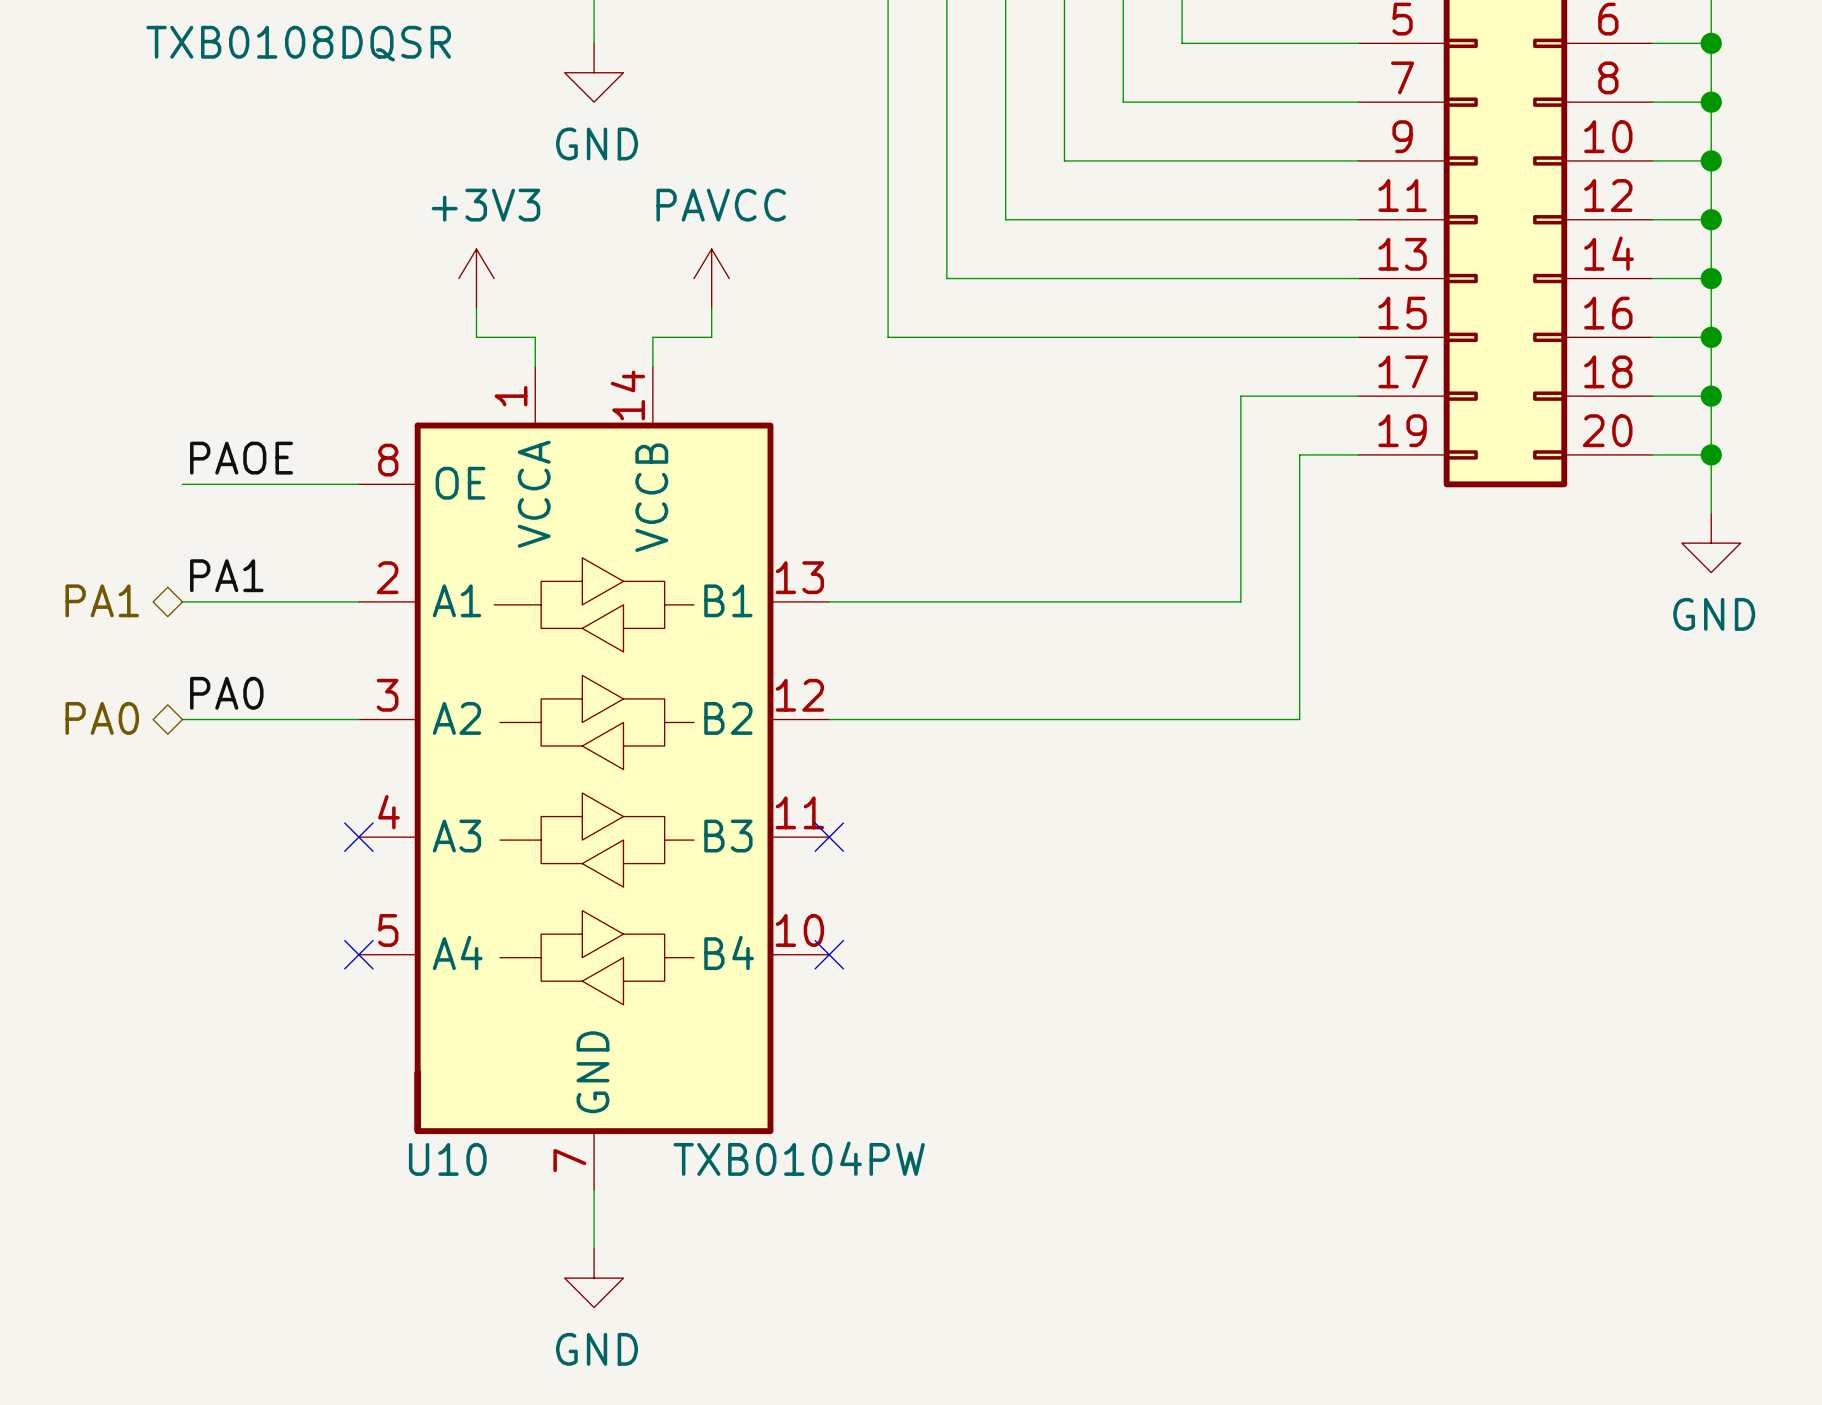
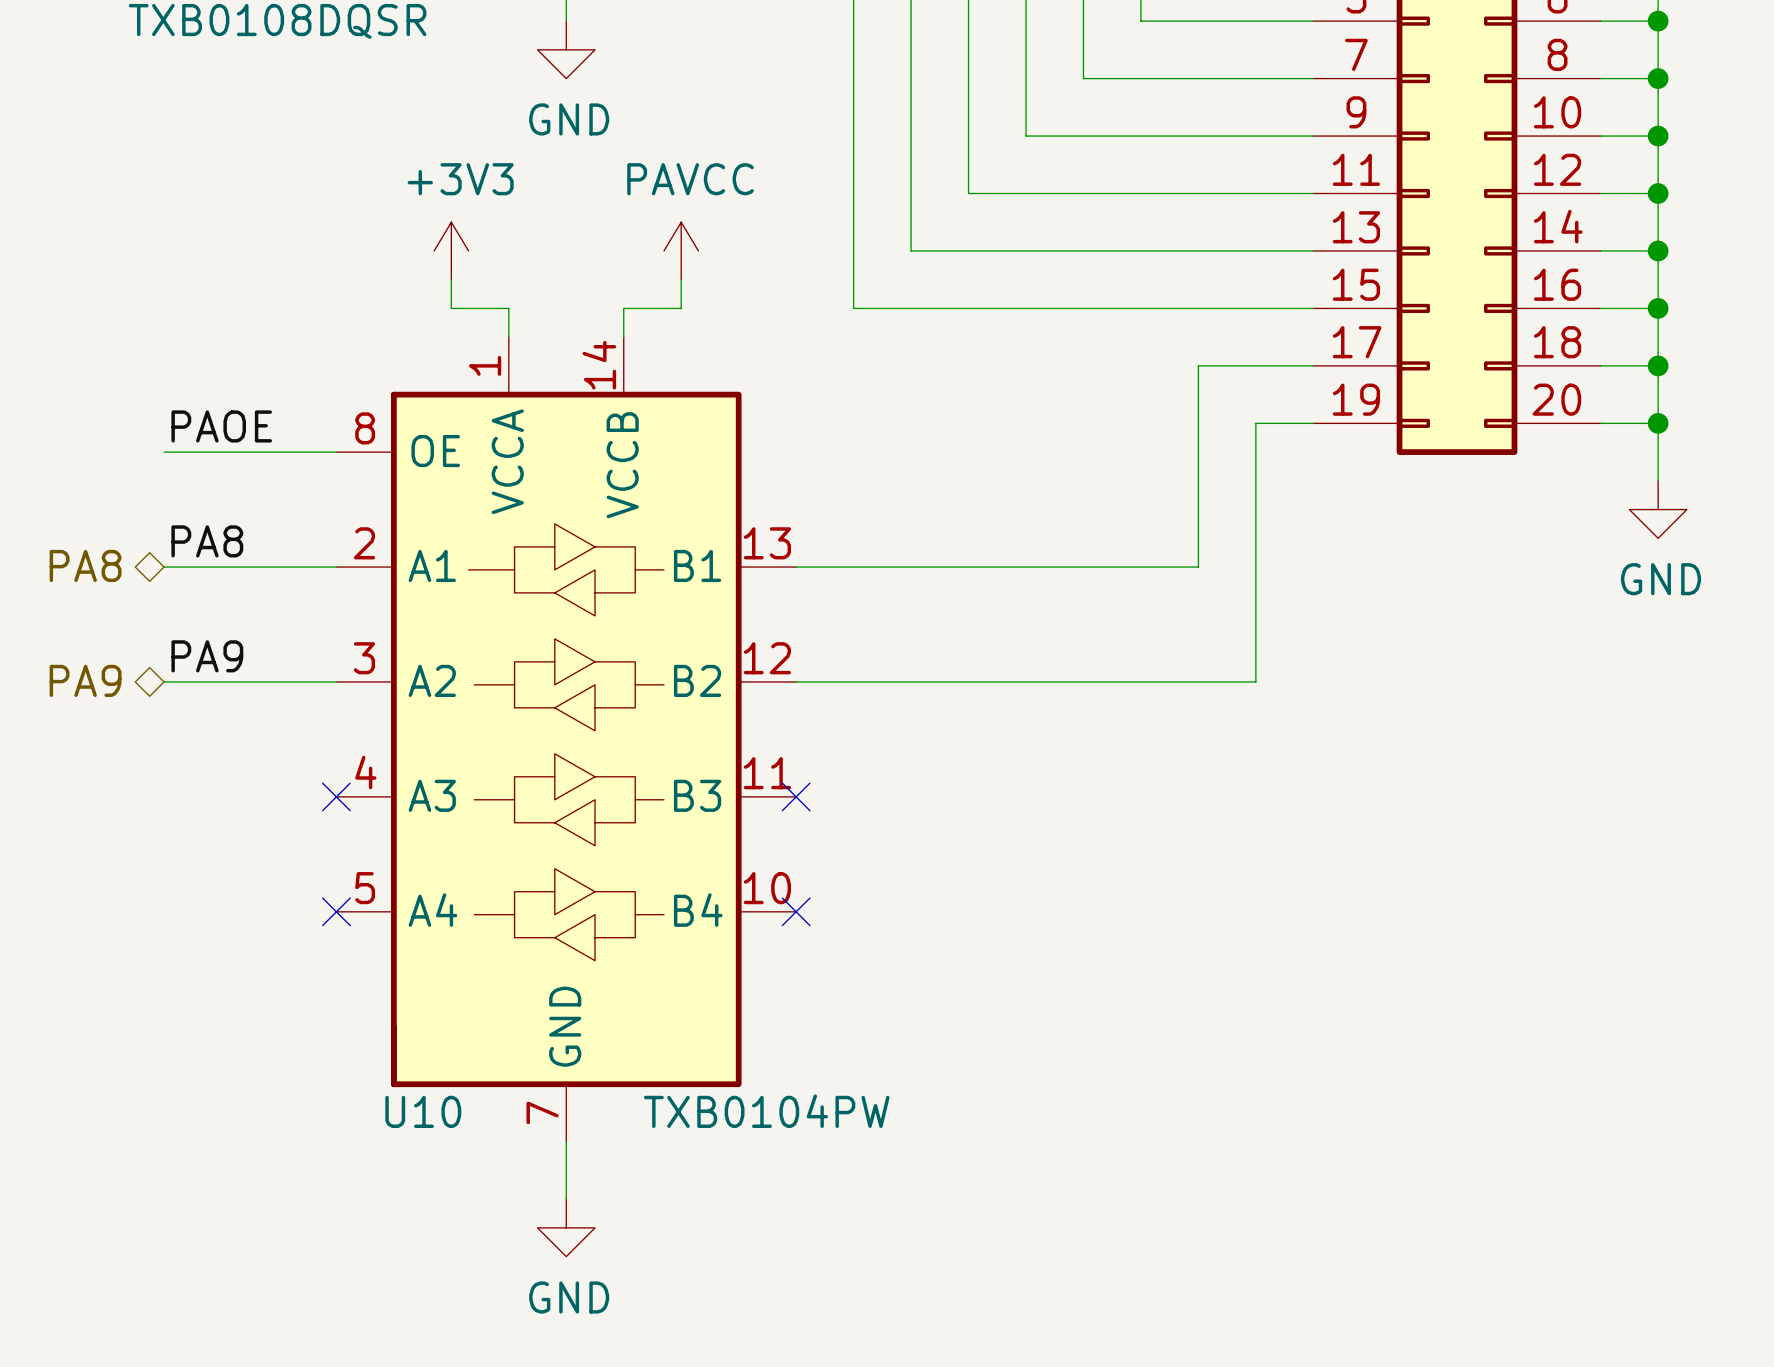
label: PA1 (226, 575) -> PA8 (207, 541)
hierarchical label: PA1 (102, 600) -> PA8 (85, 565)
label: PA0 (226, 693) -> PA9 (207, 656)
hierarchical label: PA0 (102, 718) -> PA9 (85, 680)

